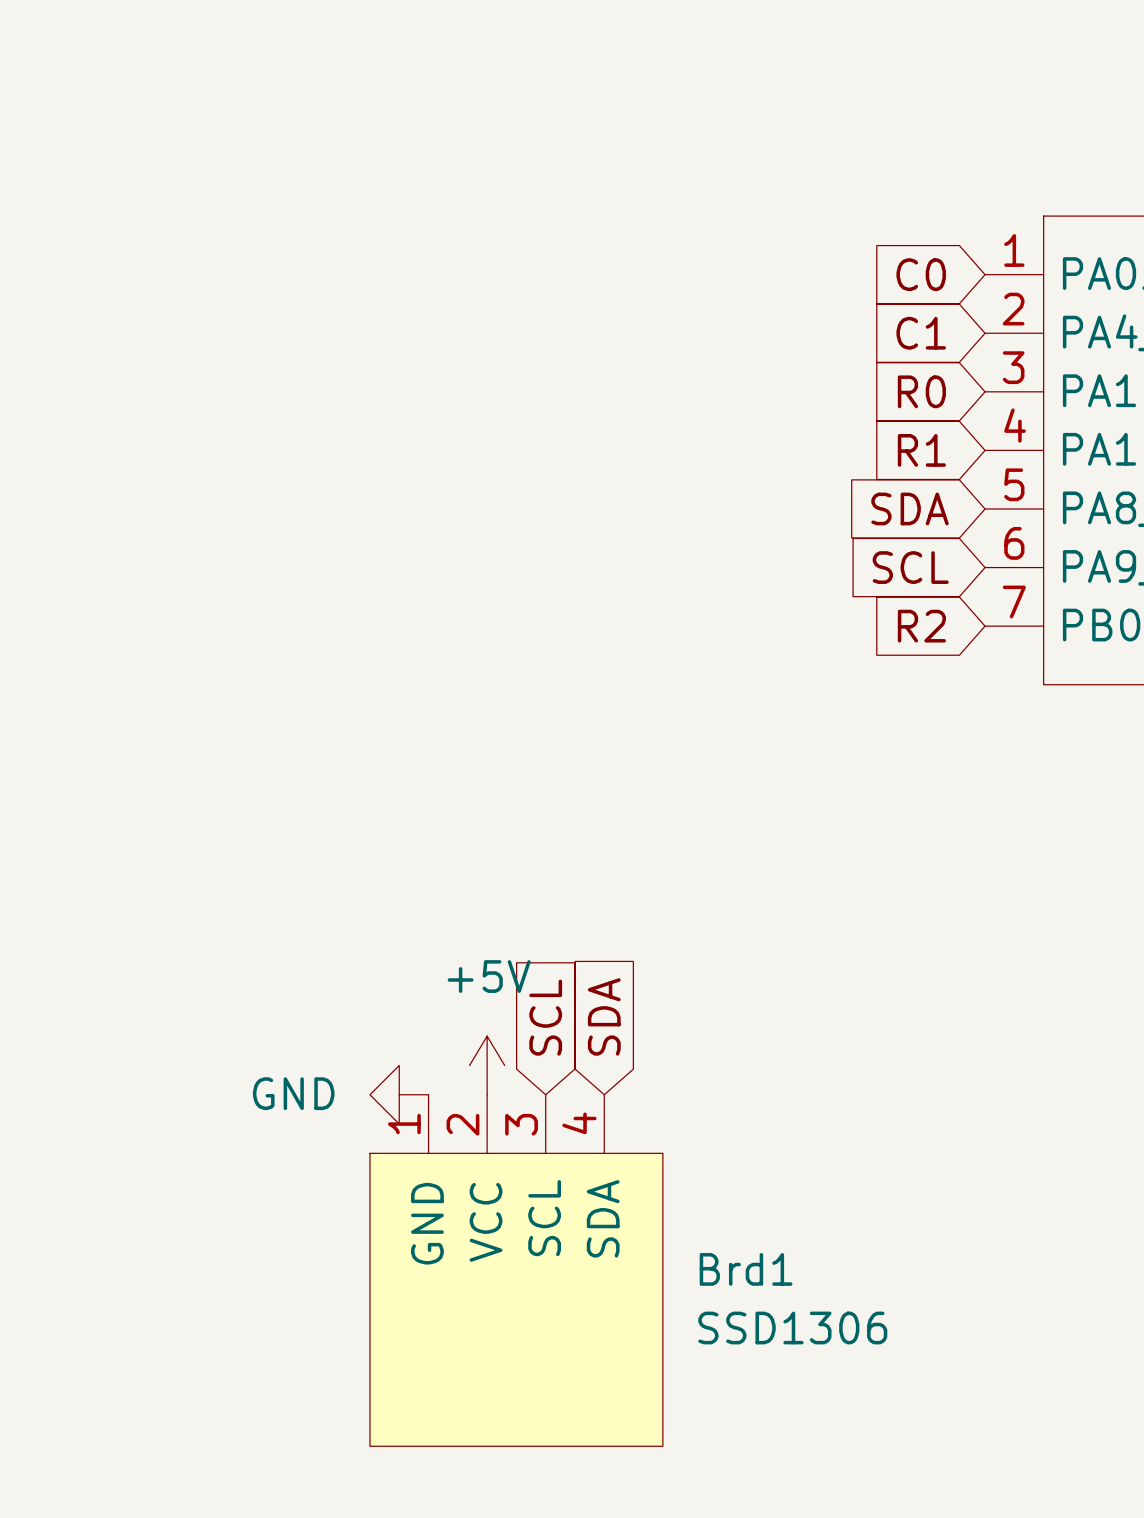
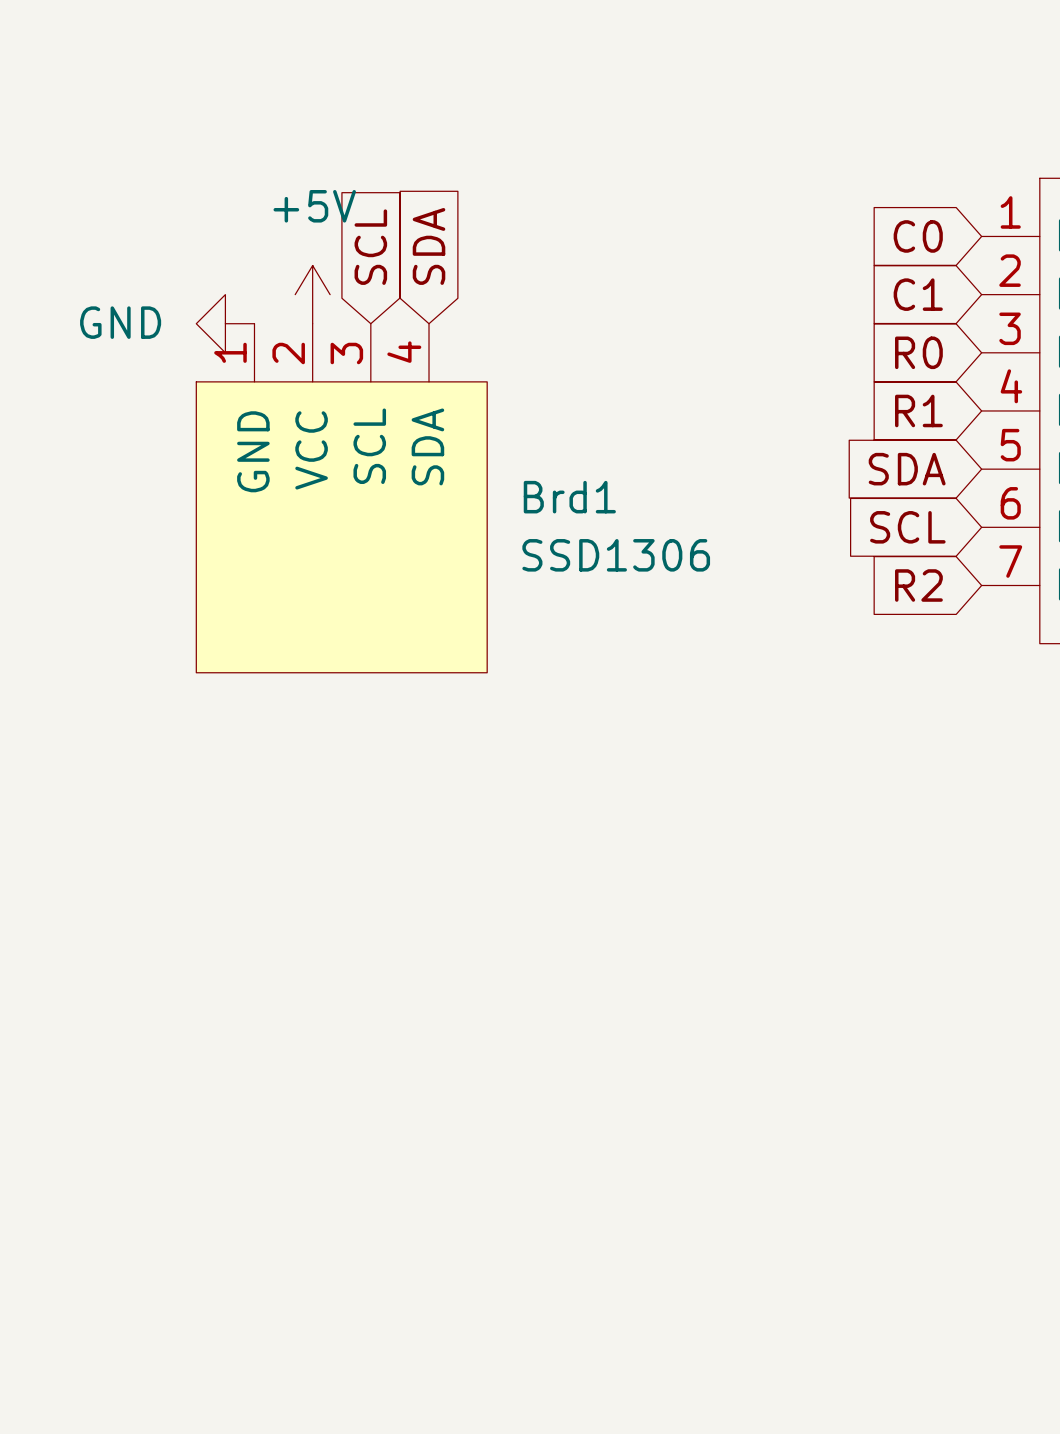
global label: none -> SDA (429, 246)
global label: none -> SCL (370, 247)
power symbol: none -> +5V (312, 294)
power symbol: none -> GND (225, 323)
global label: SDA (604, 1016) -> none
global label: SCL (545, 1017) -> none
power symbol: +5V (487, 1065) -> none
power symbol: GND (399, 1094) -> none
Brd1 position: (516, 1270) -> (341, 498)

